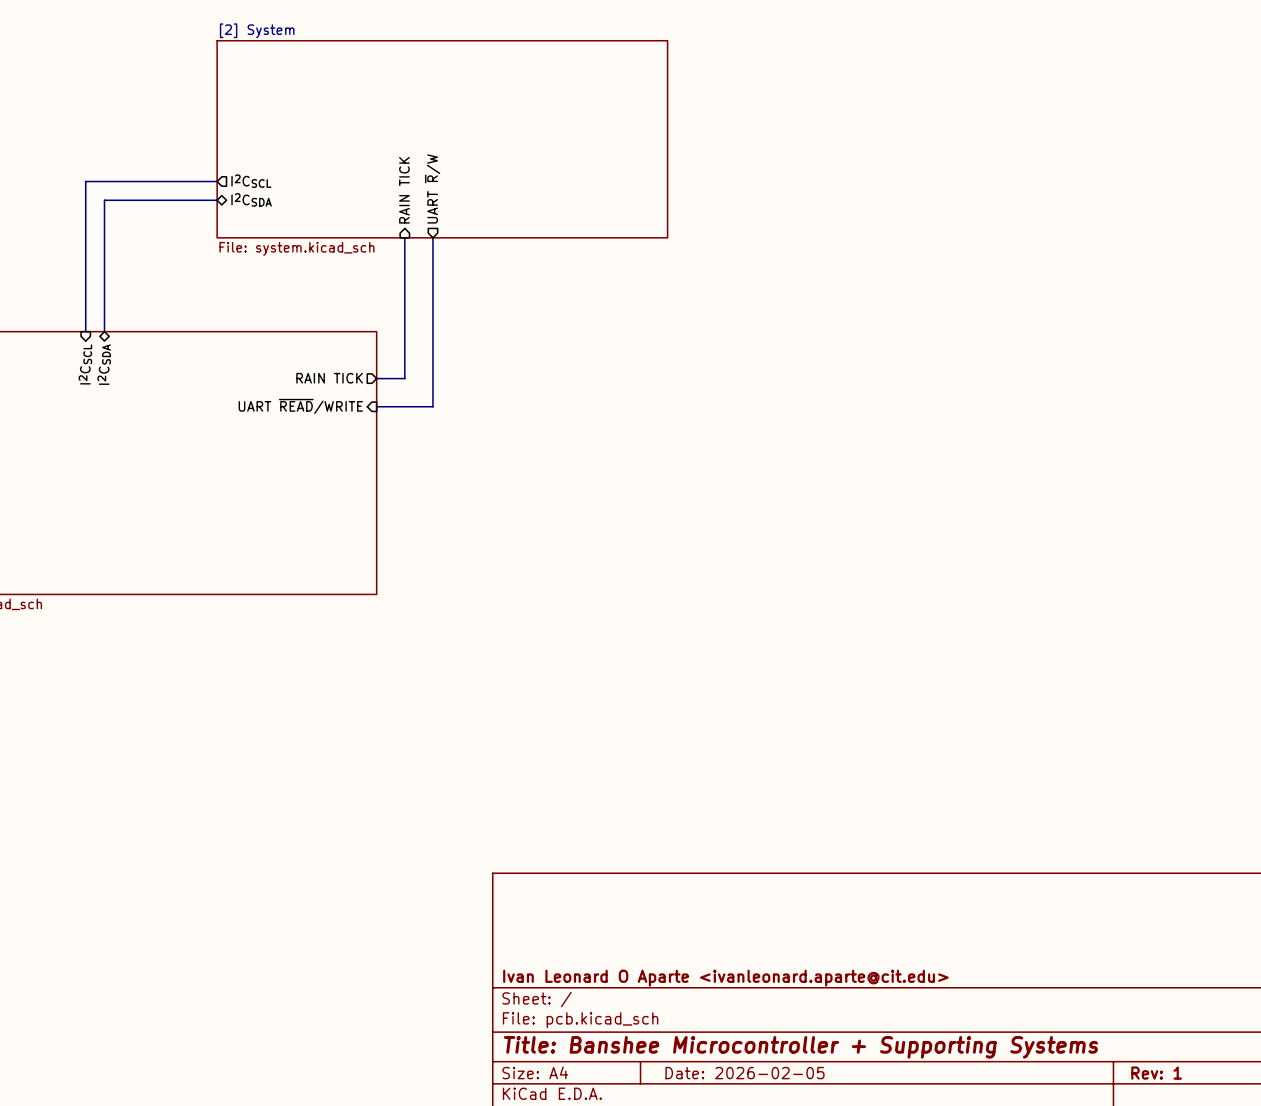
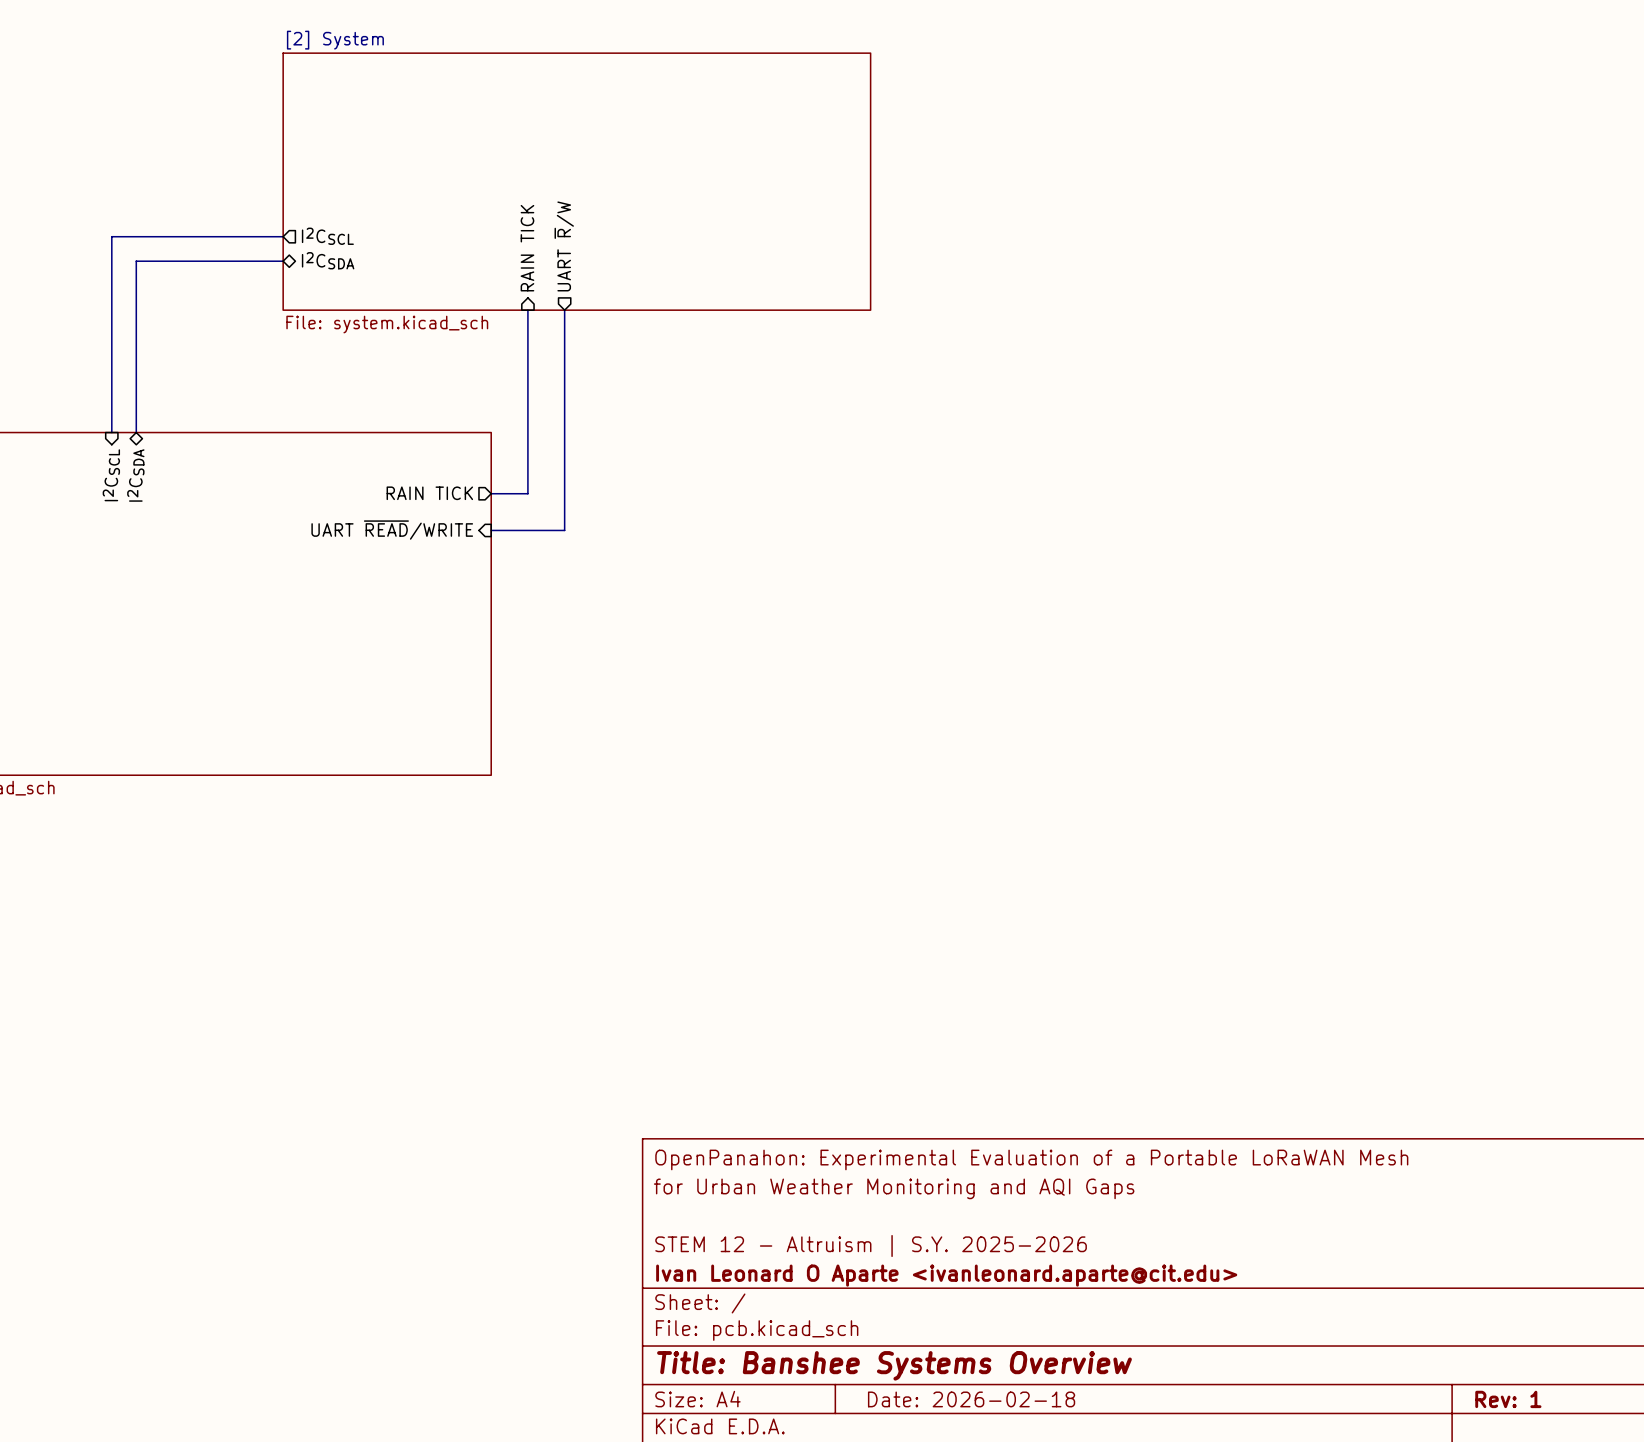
title block: none -> OpenPanahon: Experimental Evaluation of a Portable LoRaWAN Mesh (1031, 1159)
title block: none -> for Urban Weather Monitoring and AQI Gaps (894, 1188)
title block: none -> STEM 12 - Altruism | S.Y. 2025-2026 (871, 1246)
title block: Title: Banshee Microcontroller + Supporting Systems (800, 1047) -> Title: Banshee Systems Overview (894, 1365)
title block: Date: 2026-02-05 (744, 1073) -> Date: 2026-02-18 (971, 1399)

